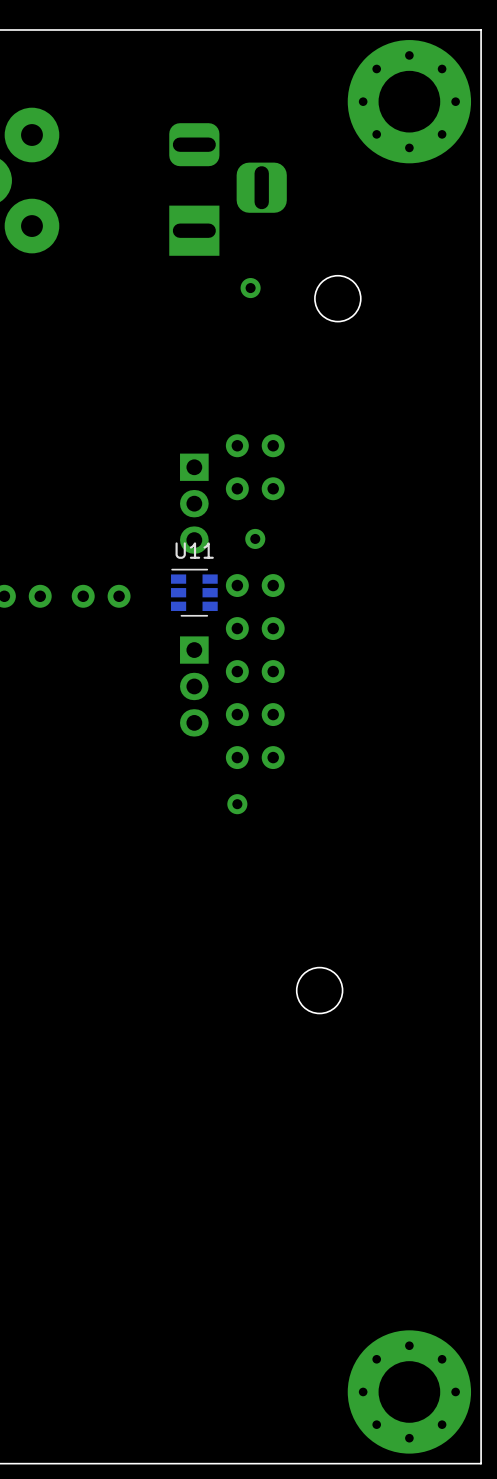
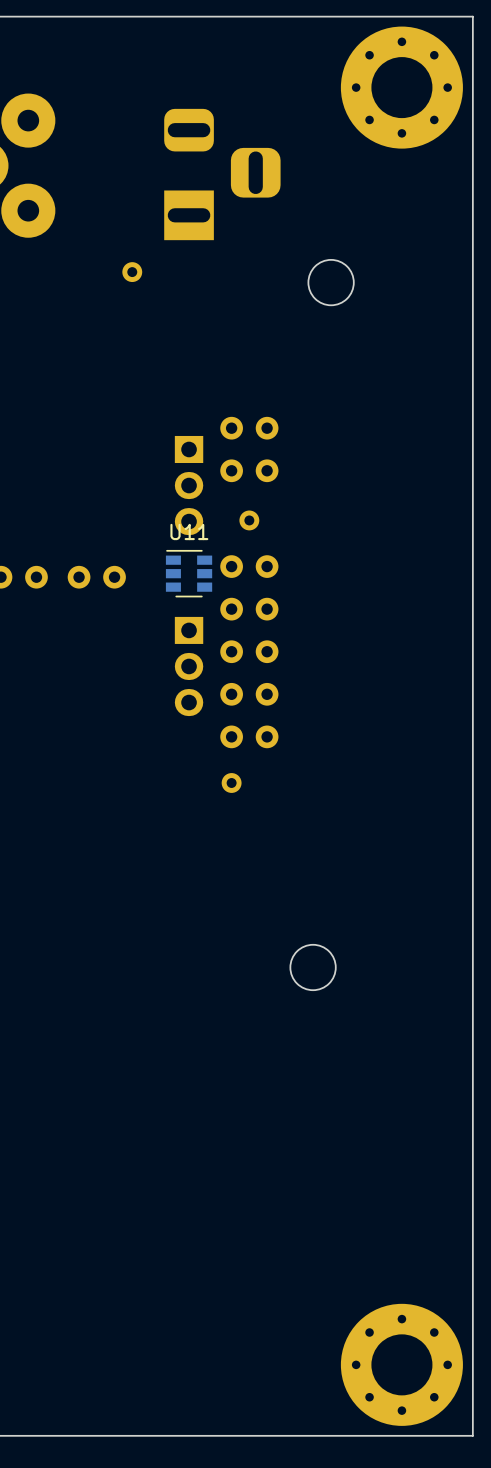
part position: (250, 288) -> (132, 272)

